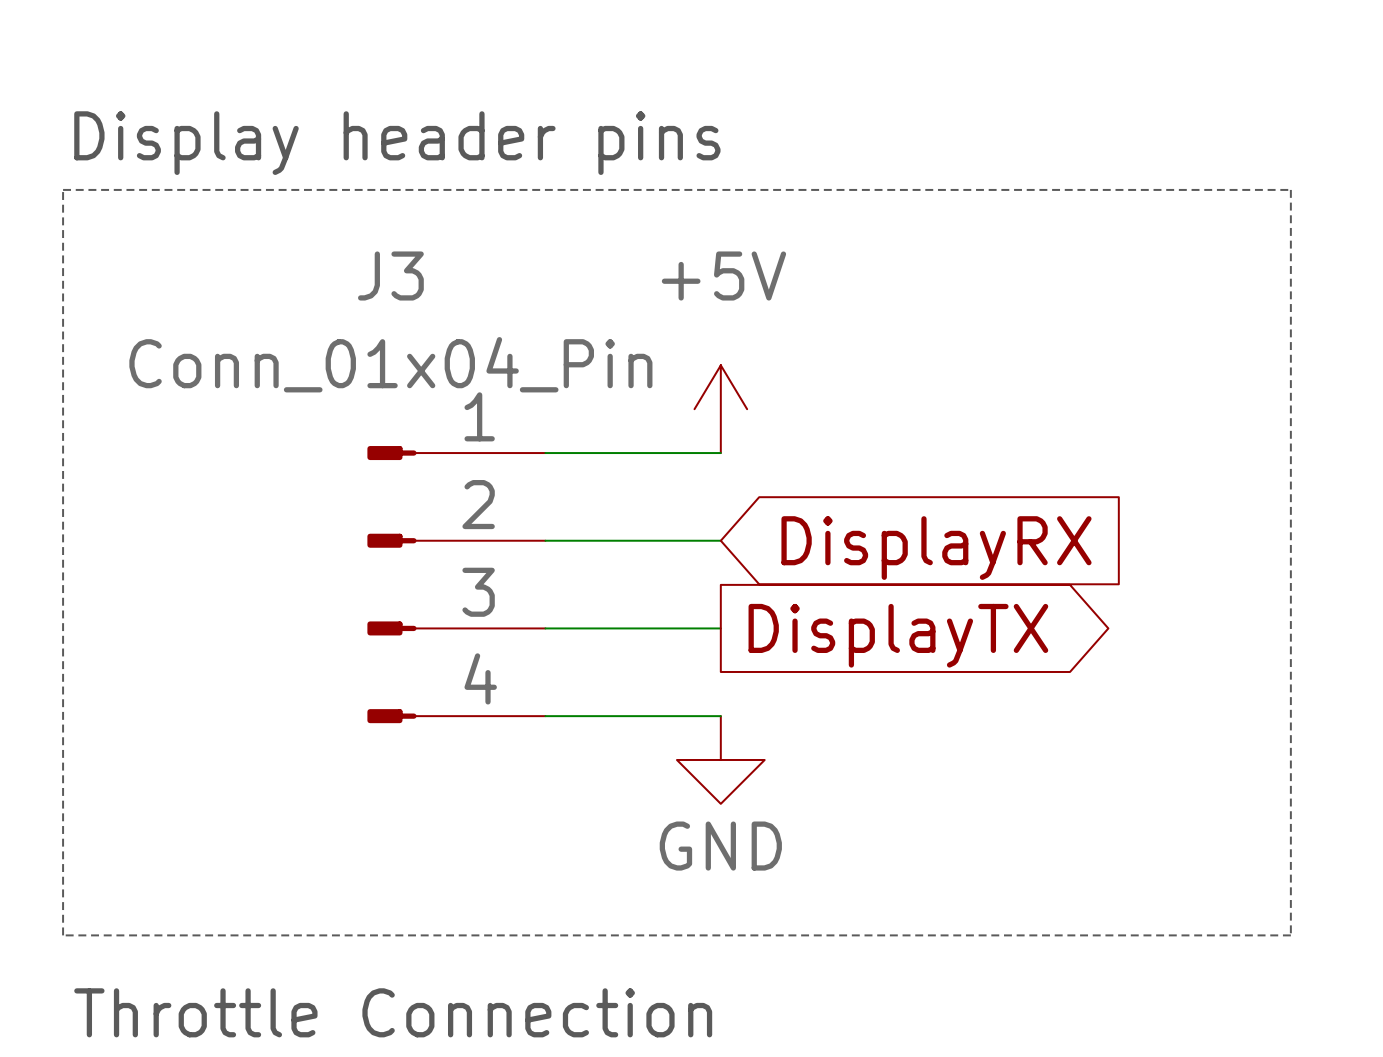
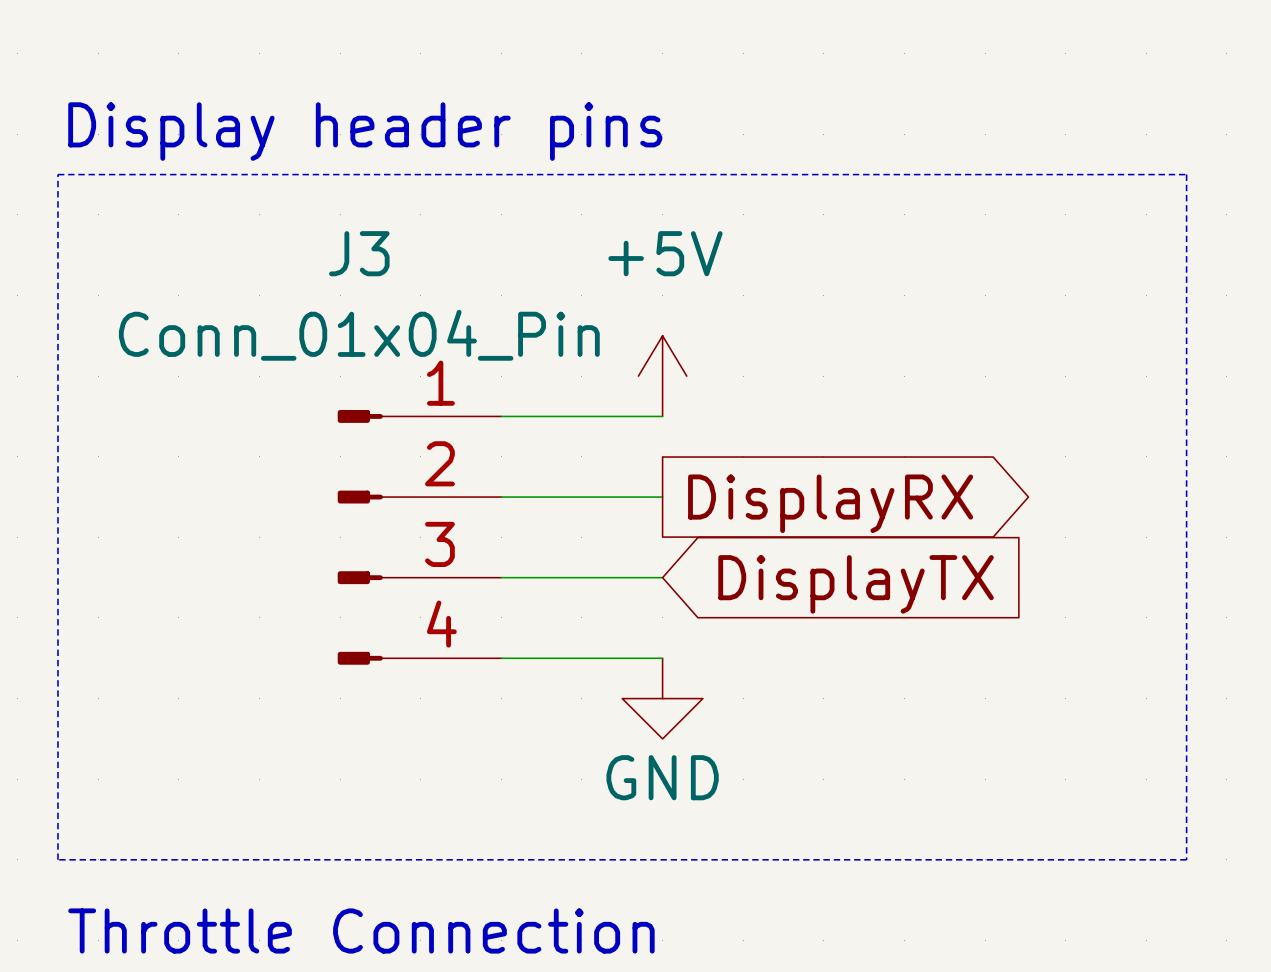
global label shape: input (936, 548) -> output (830, 503)
global label shape: output (898, 635) -> input (856, 584)

